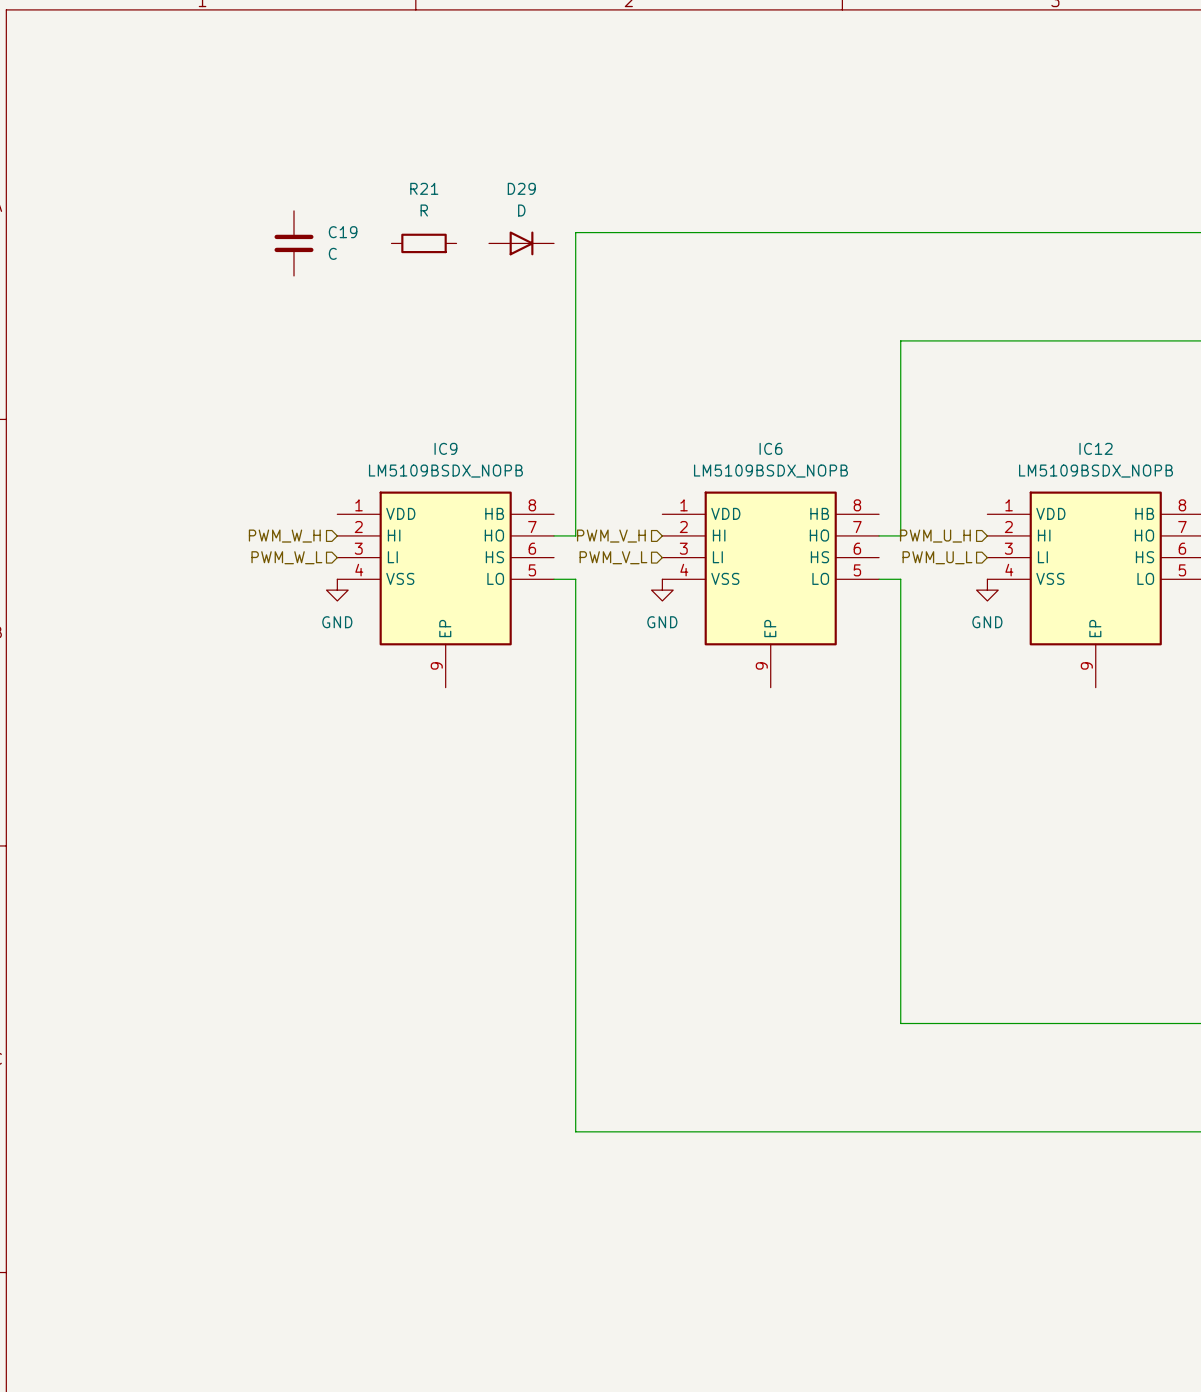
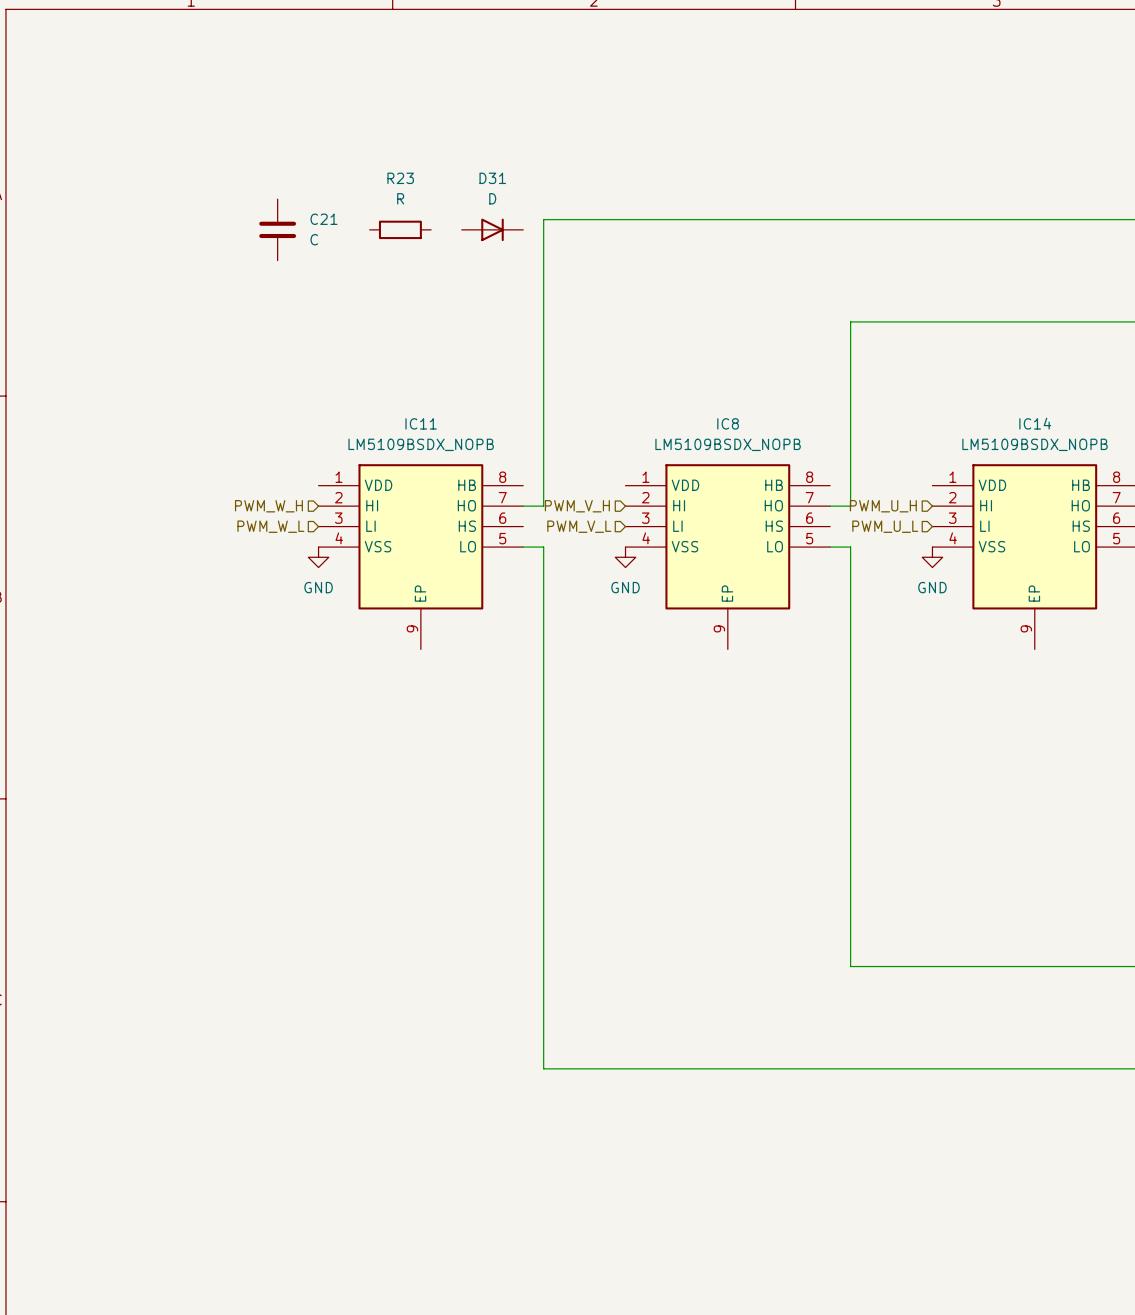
R21 name: R21 (424, 188) -> R23 (400, 178)
D29 name: D29 (521, 188) -> D31 (492, 178)
C19 name: C19 (343, 232) -> C21 (324, 219)
IC9 name: IC9 (445, 448) -> IC11 (421, 423)
IC6 name: IC6 (770, 448) -> IC8 (728, 423)
IC12 name: IC12 (1096, 448) -> IC14 (1035, 423)

